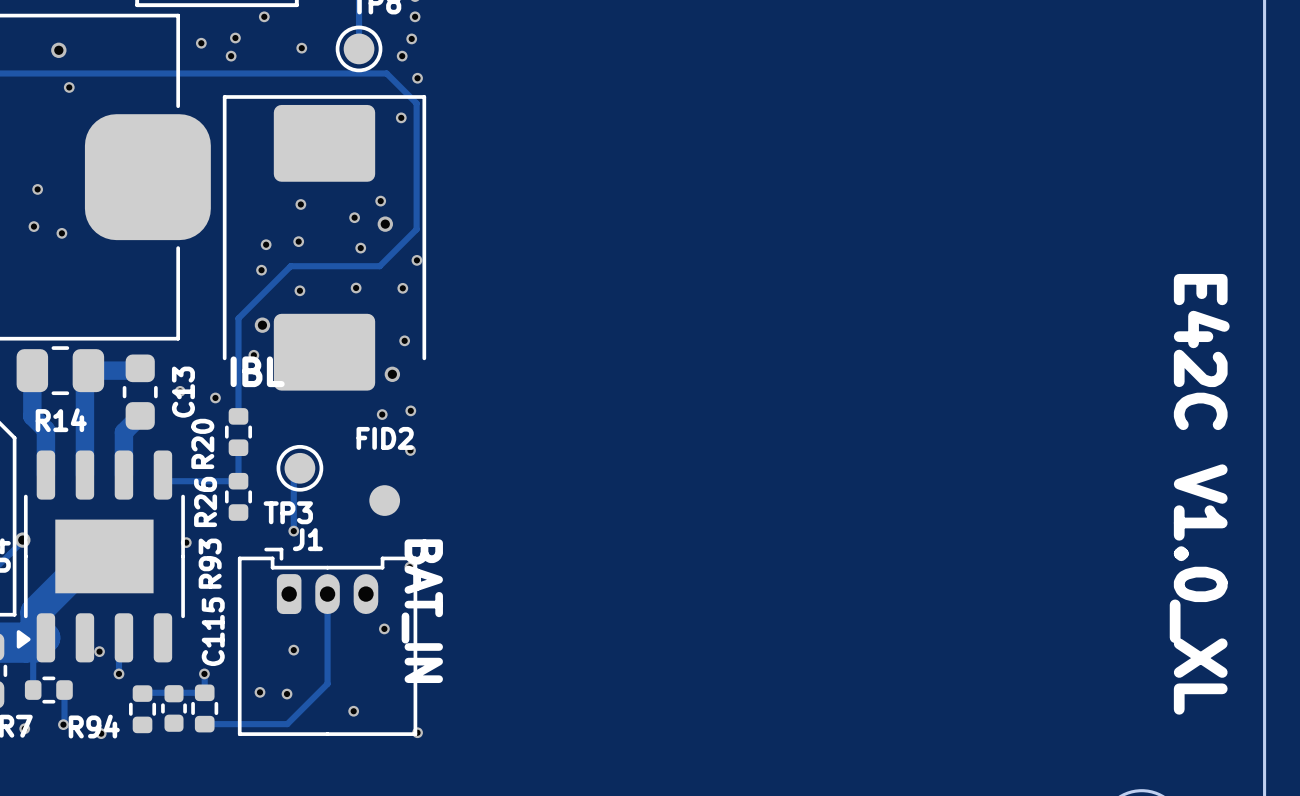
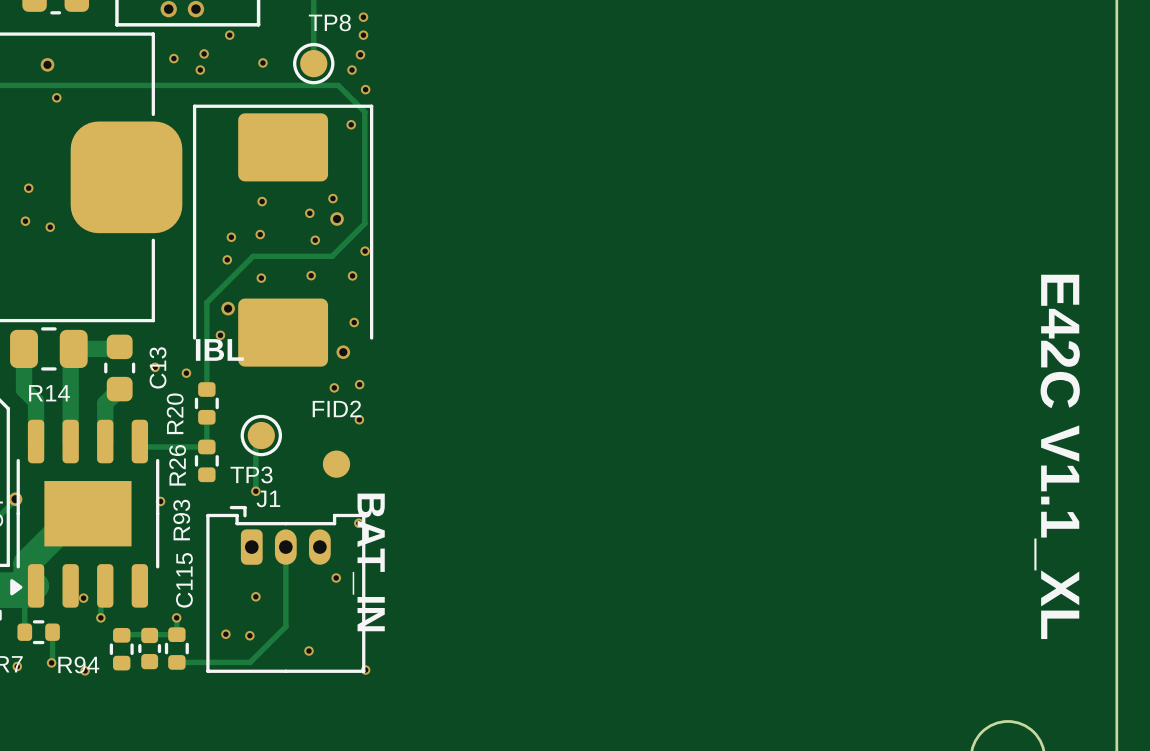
text: E42C V1.0_XL (1199, 494) -> E42C V1.1_XL (1057, 456)

